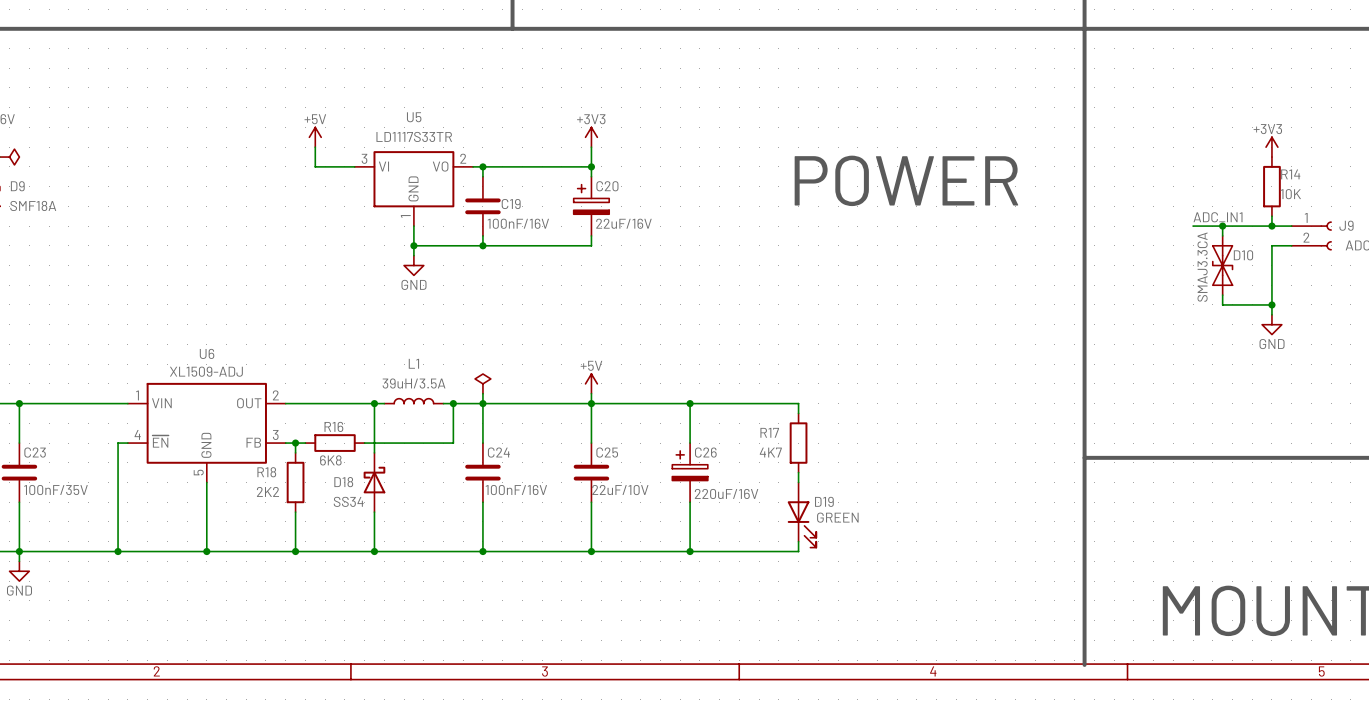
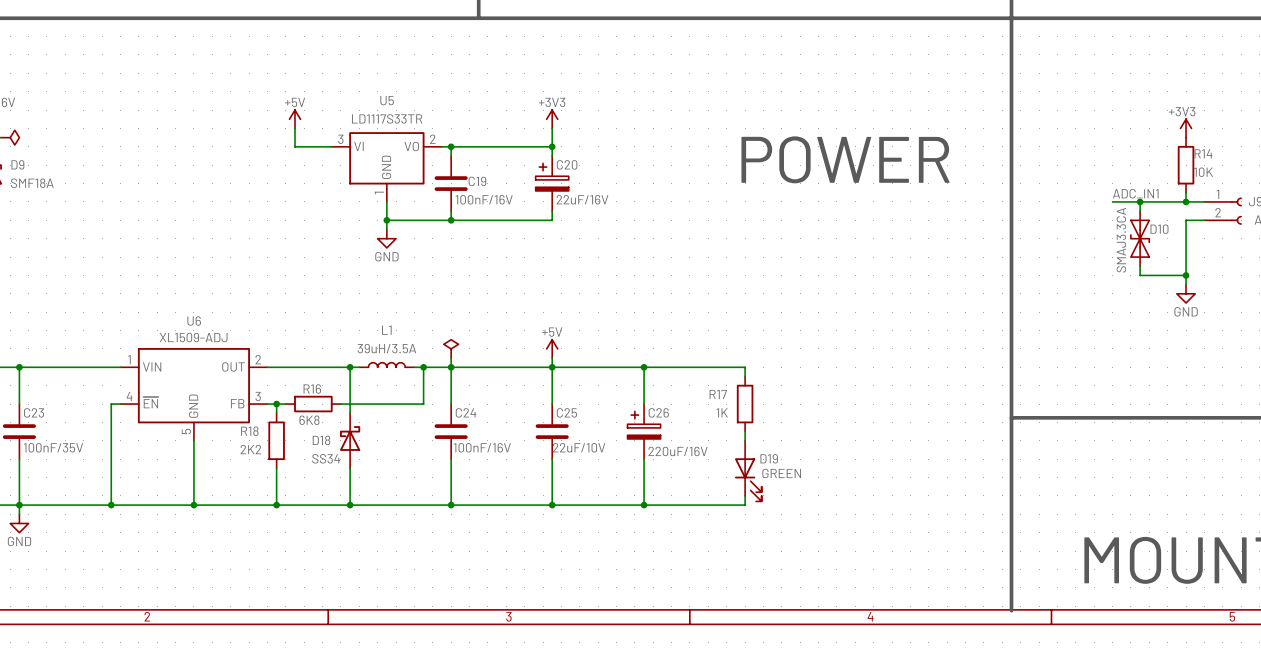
R17 value: 4K7 (770, 452) -> 1K (722, 412)

